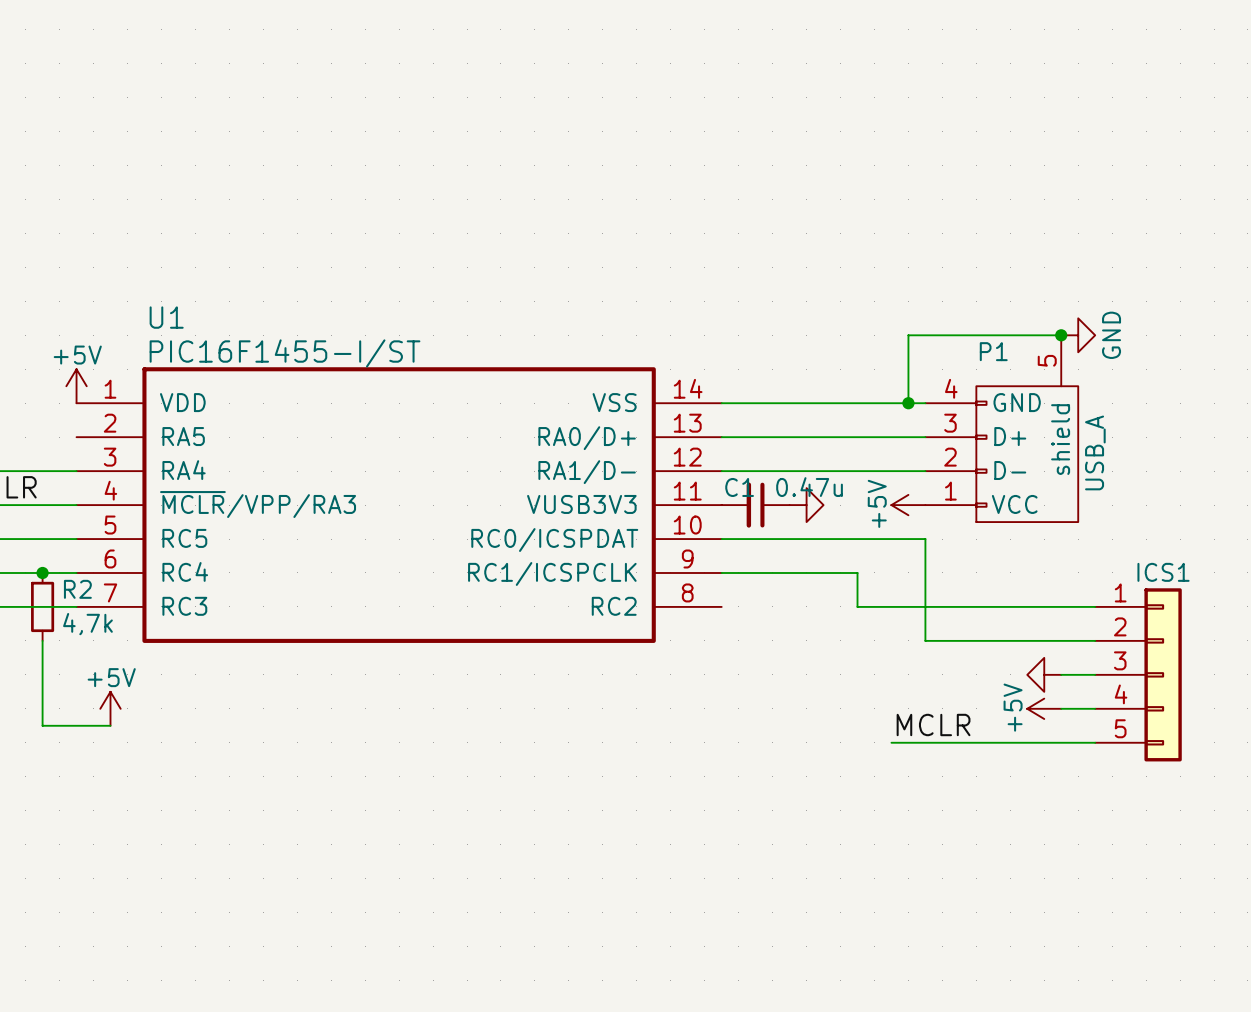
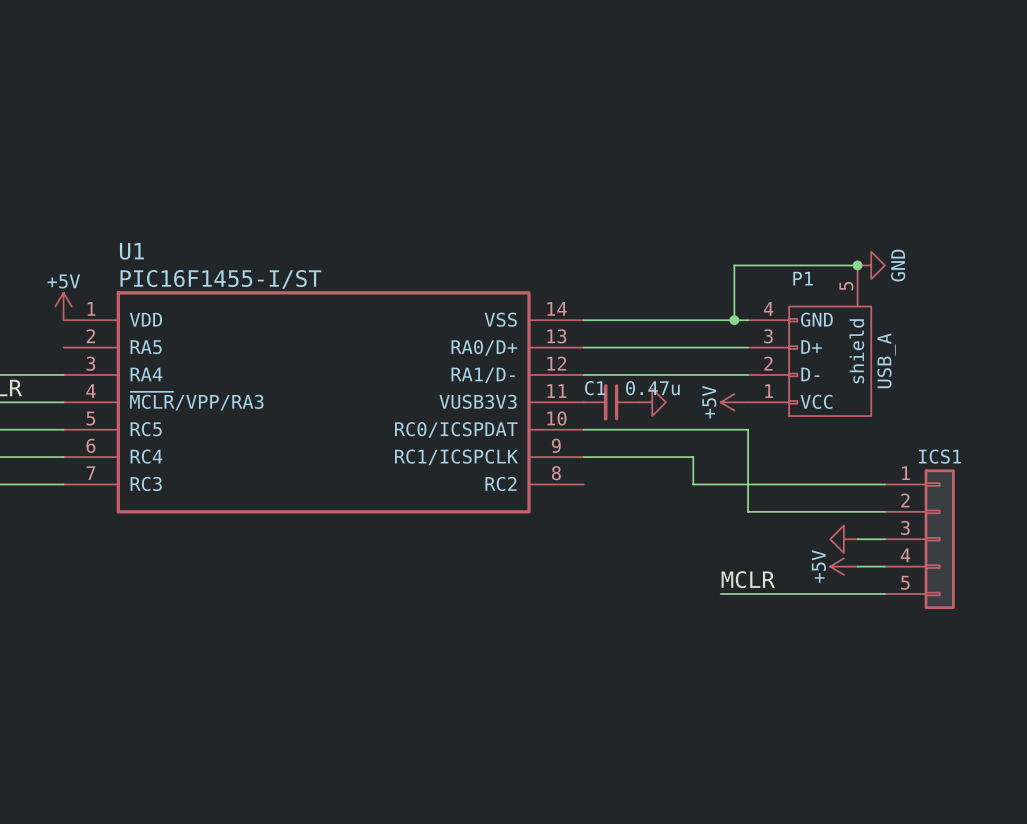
junction: (42, 572) -> none
R2: 4,7k (42, 606) -> none
wire: (42, 640) (42, 725) (110, 725) -> none
power symbol: +5V (110, 708) -> none

